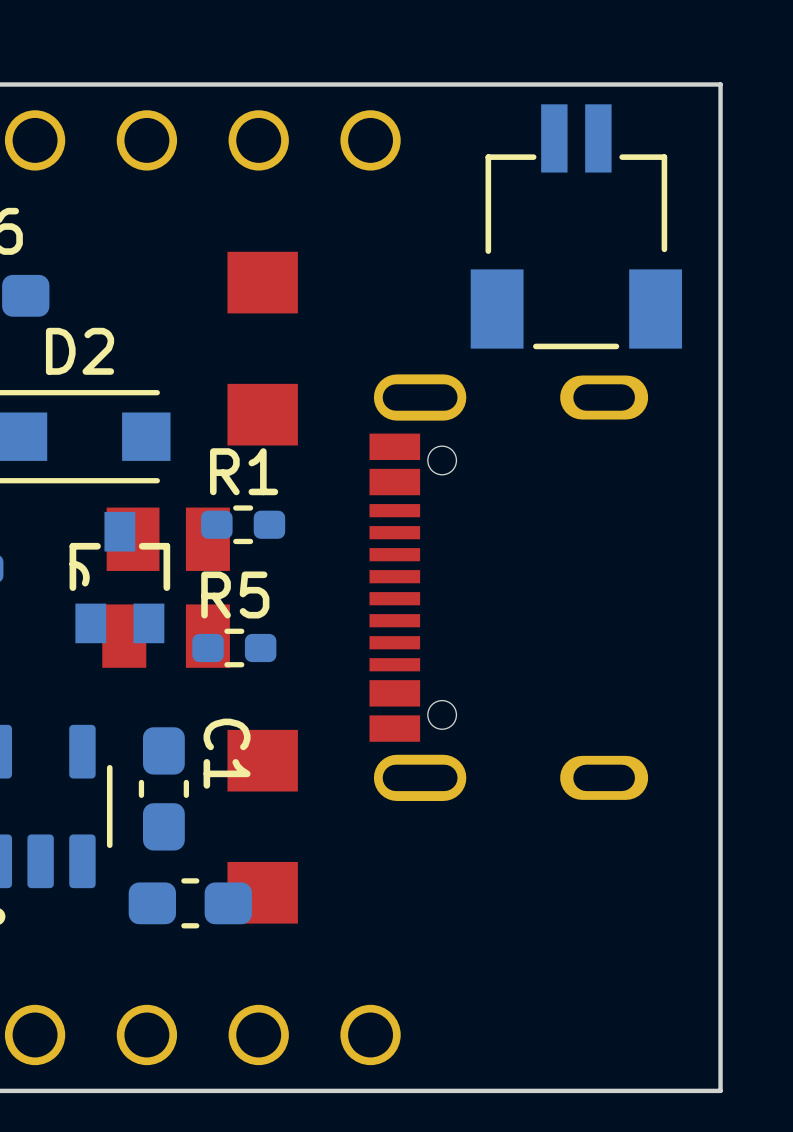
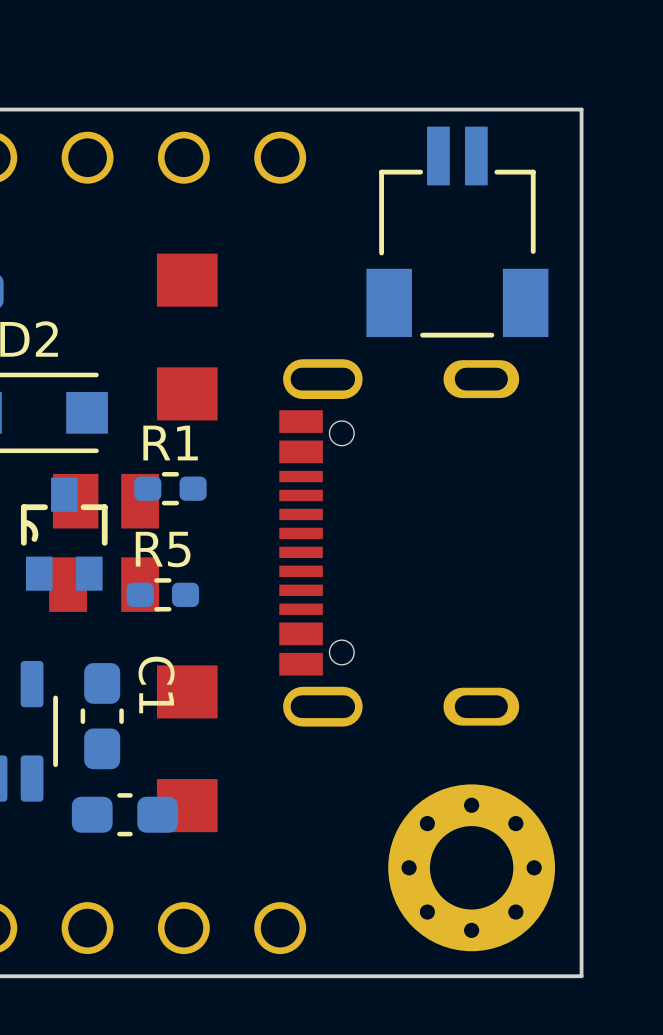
part: none -> (471, 867)

